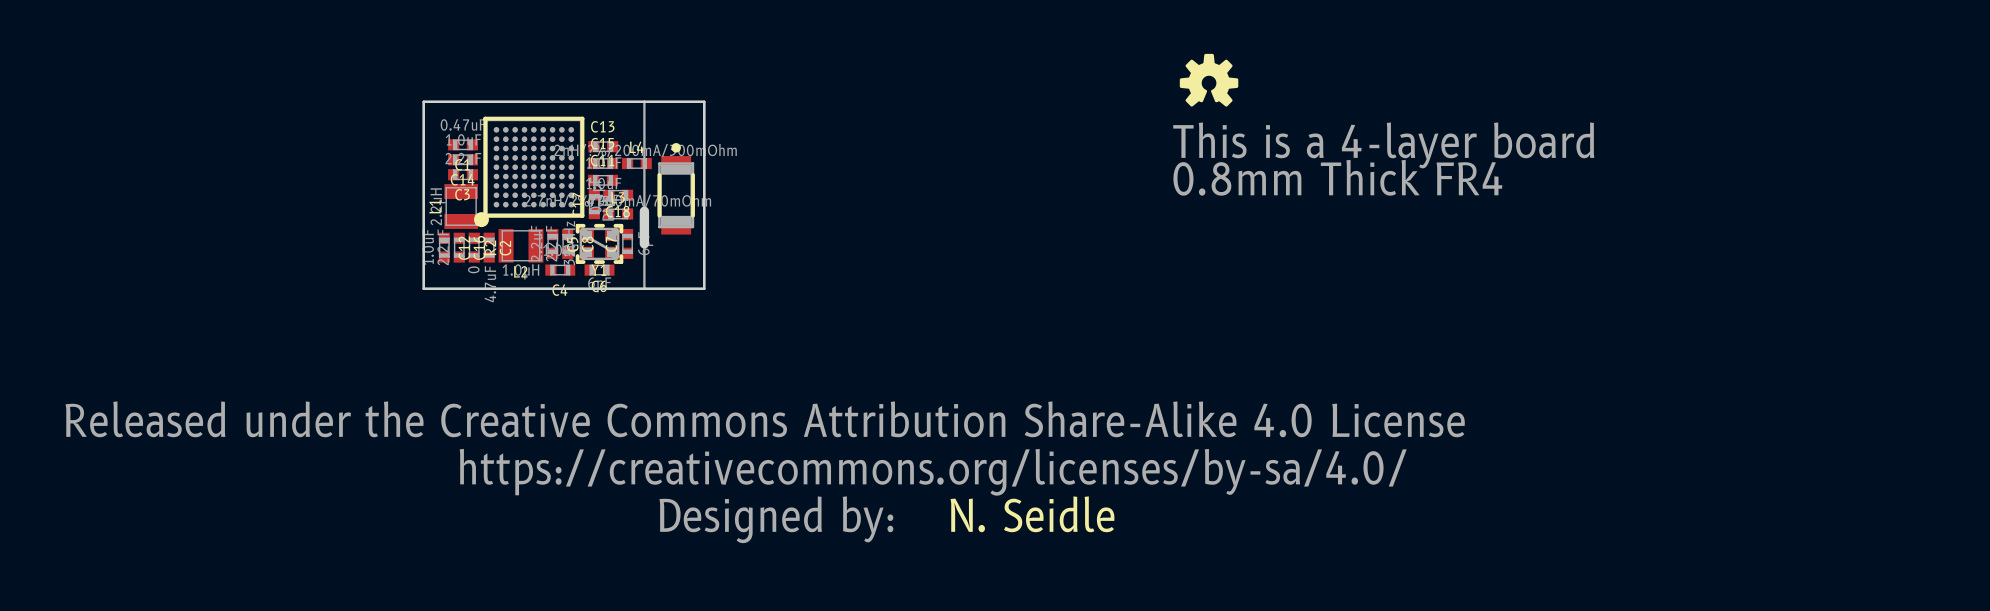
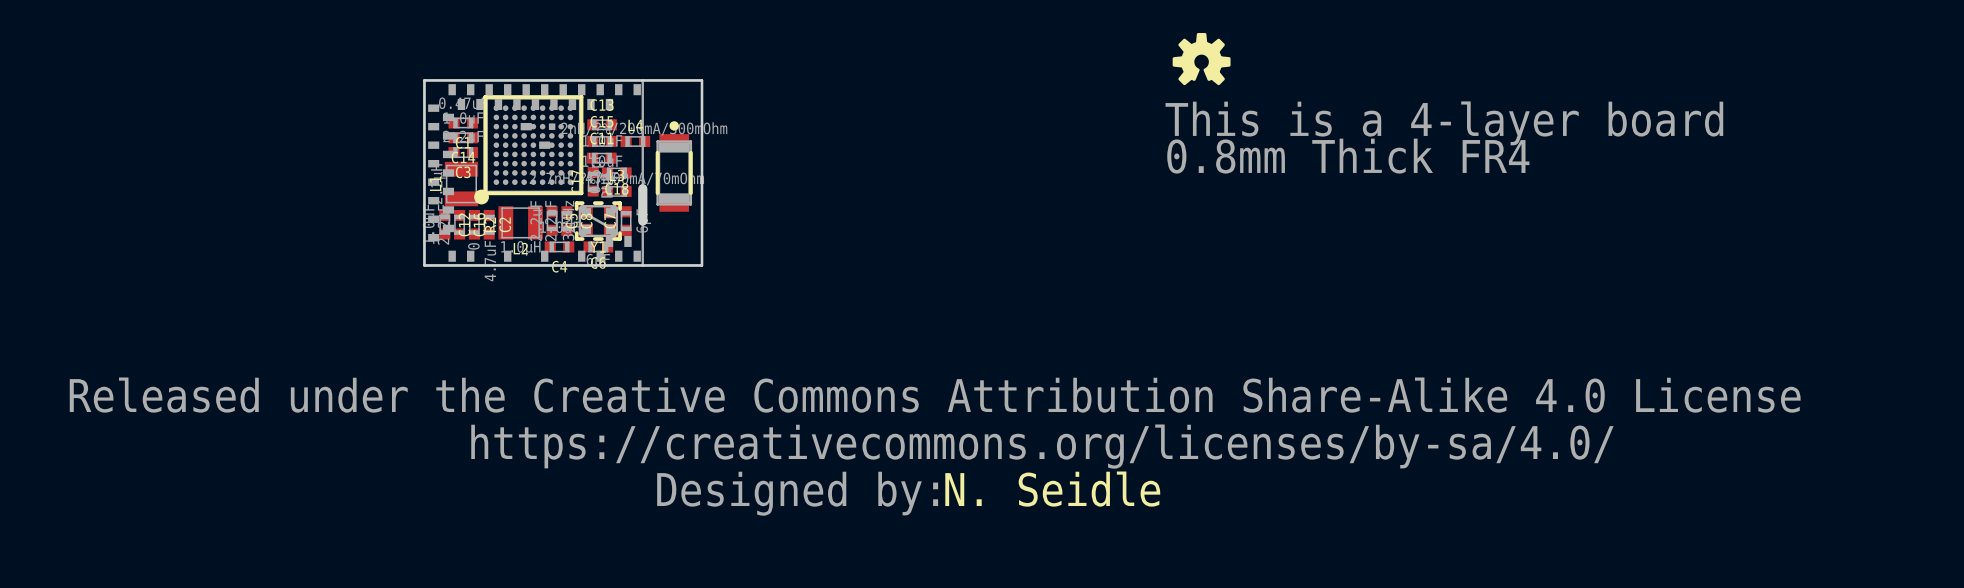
drawing: none -> [428, 84, 641, 262]
drawing: none -> [578, 235, 641, 262]
drawing: none -> [504, 250, 512, 262]
drawing: none -> [541, 250, 549, 262]

